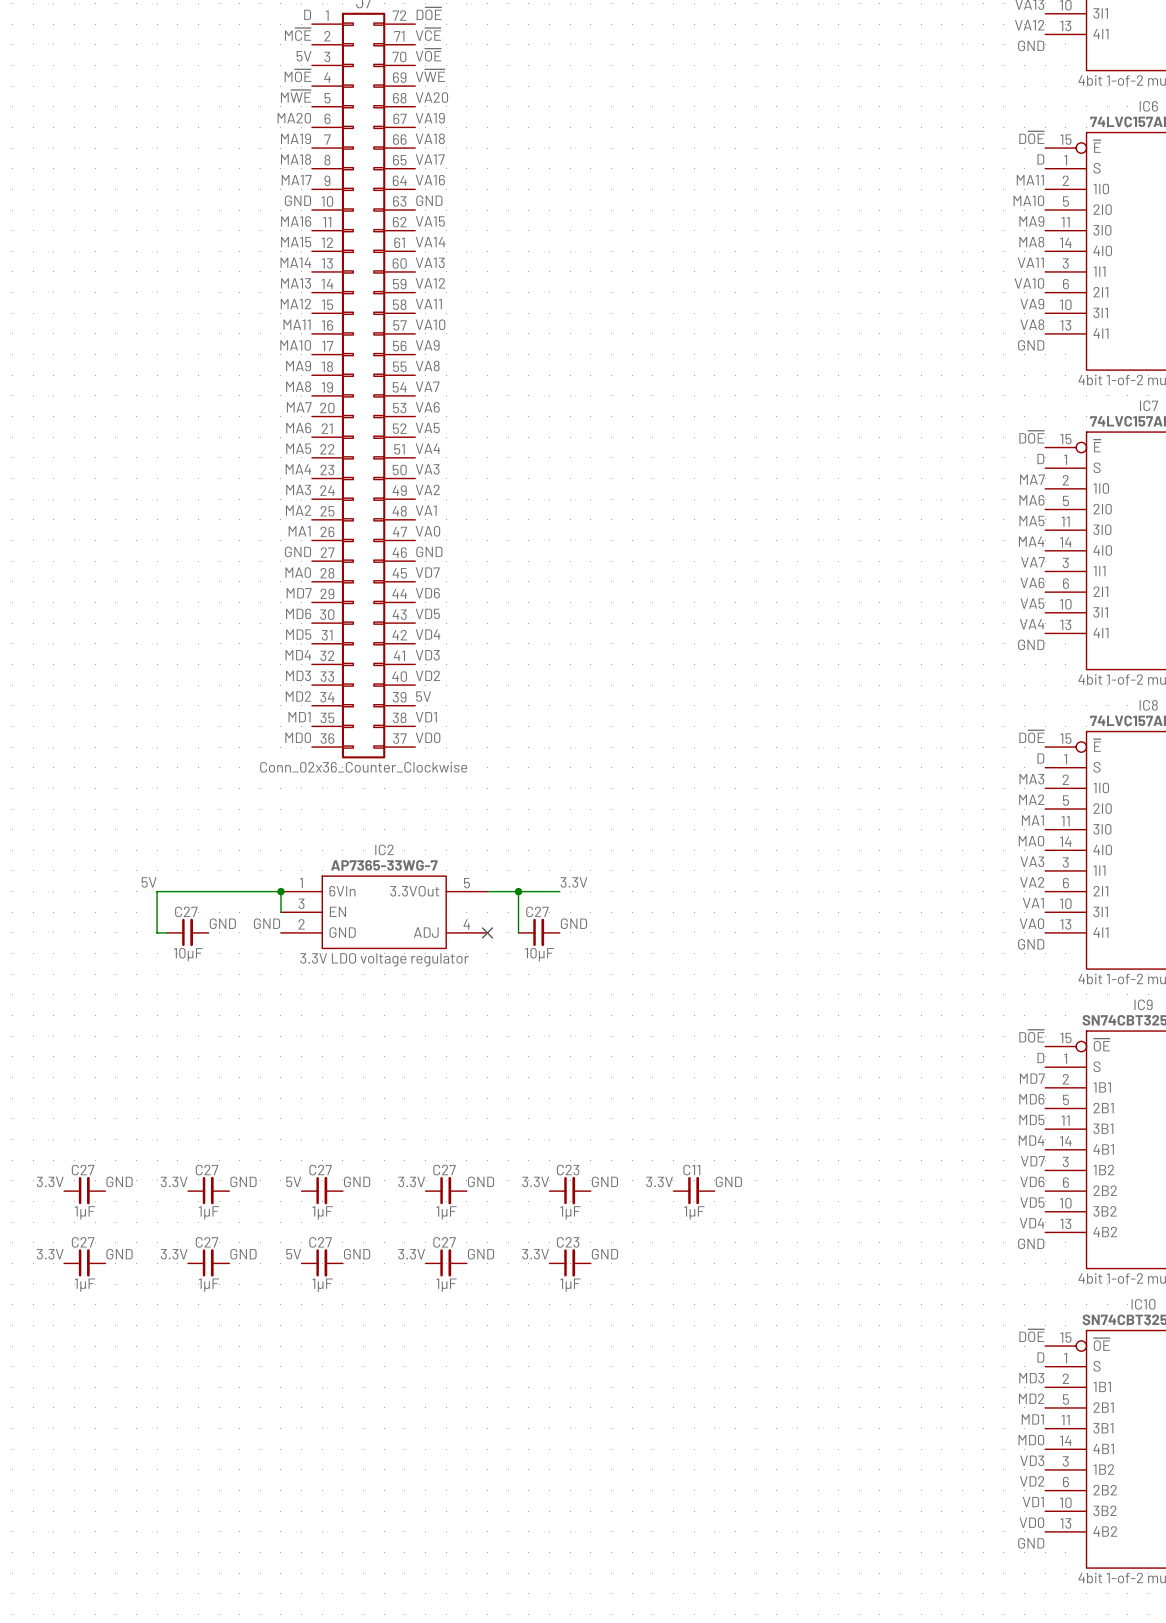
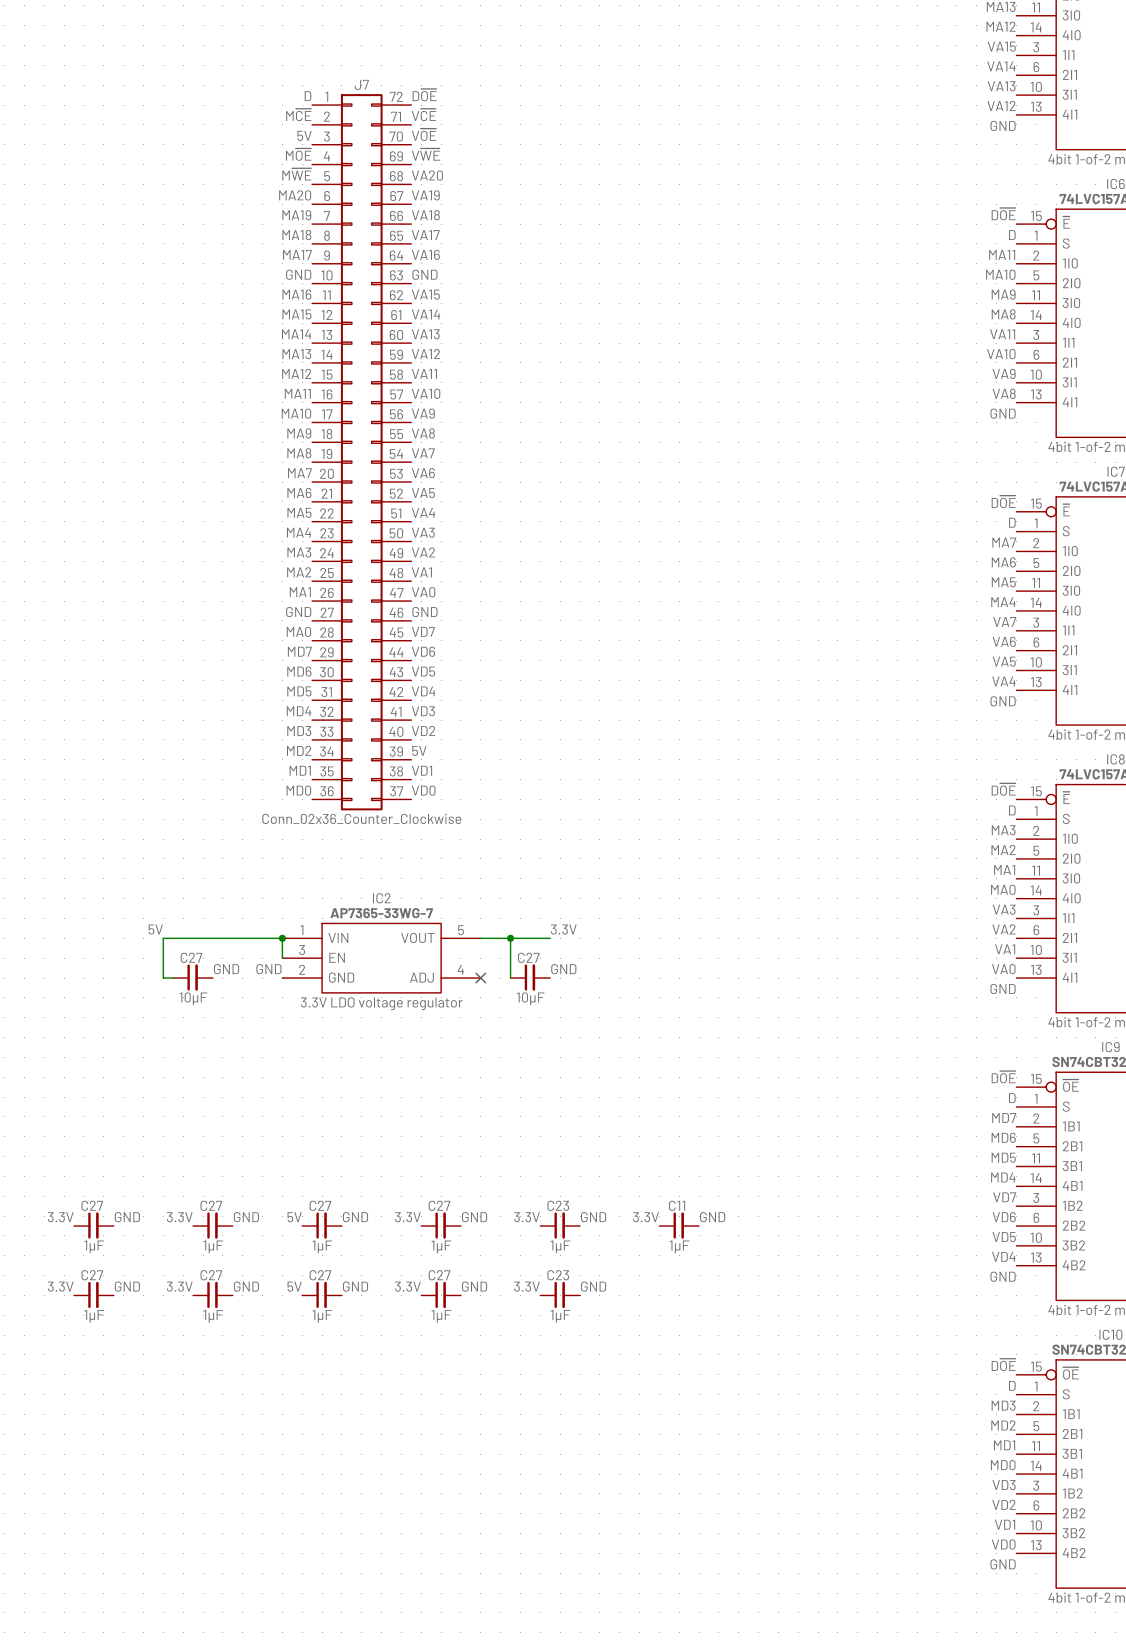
IC2 pin name: 6VIn (342, 891) -> VIN (338, 937)
IC2 pin name: 3.3VOut (414, 891) -> VOUT (417, 937)

